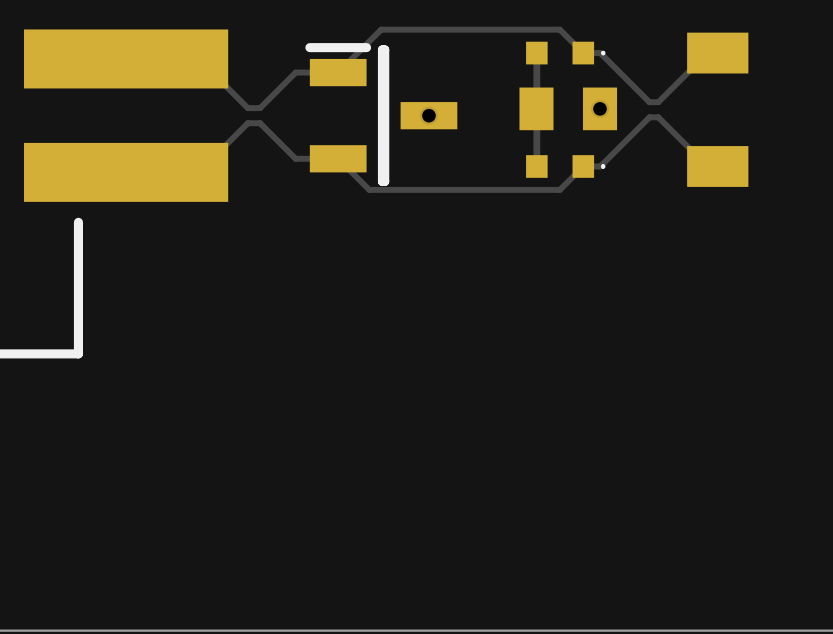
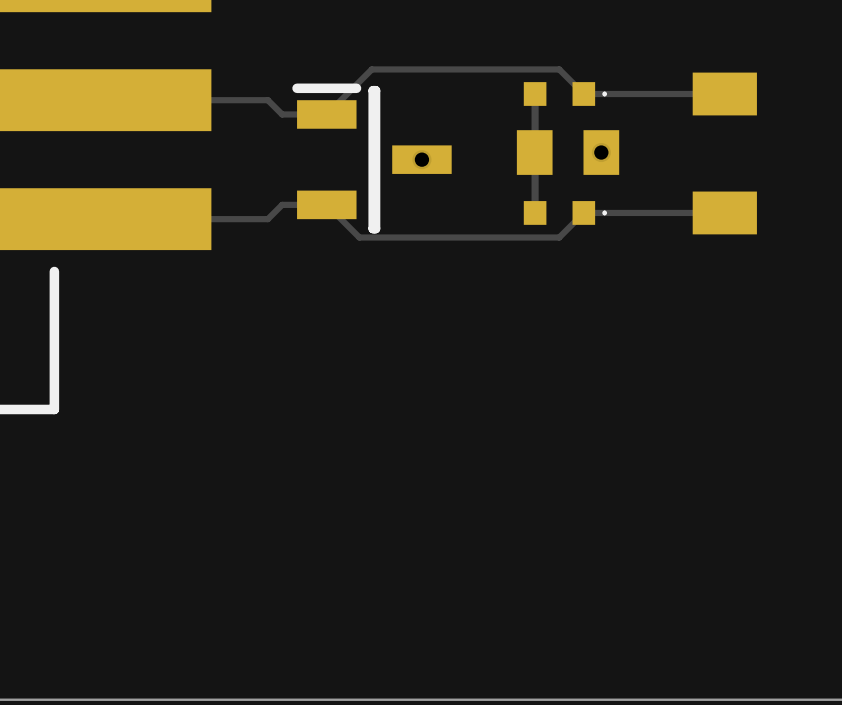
track: (600, 53) (649, 102) (658, 102) (707, 53) -> (601, 94) (714, 94)
track: (198, 58) (247, 108) (260, 108) (295, 72) -> (180, 100) (267, 100) (282, 114)
track: (295, 158) (260, 123) (247, 123) (198, 172) -> (282, 204) (267, 219) (180, 219)
track: (600, 166) (649, 117) (658, 117) (707, 166) -> (601, 212) (714, 212)

